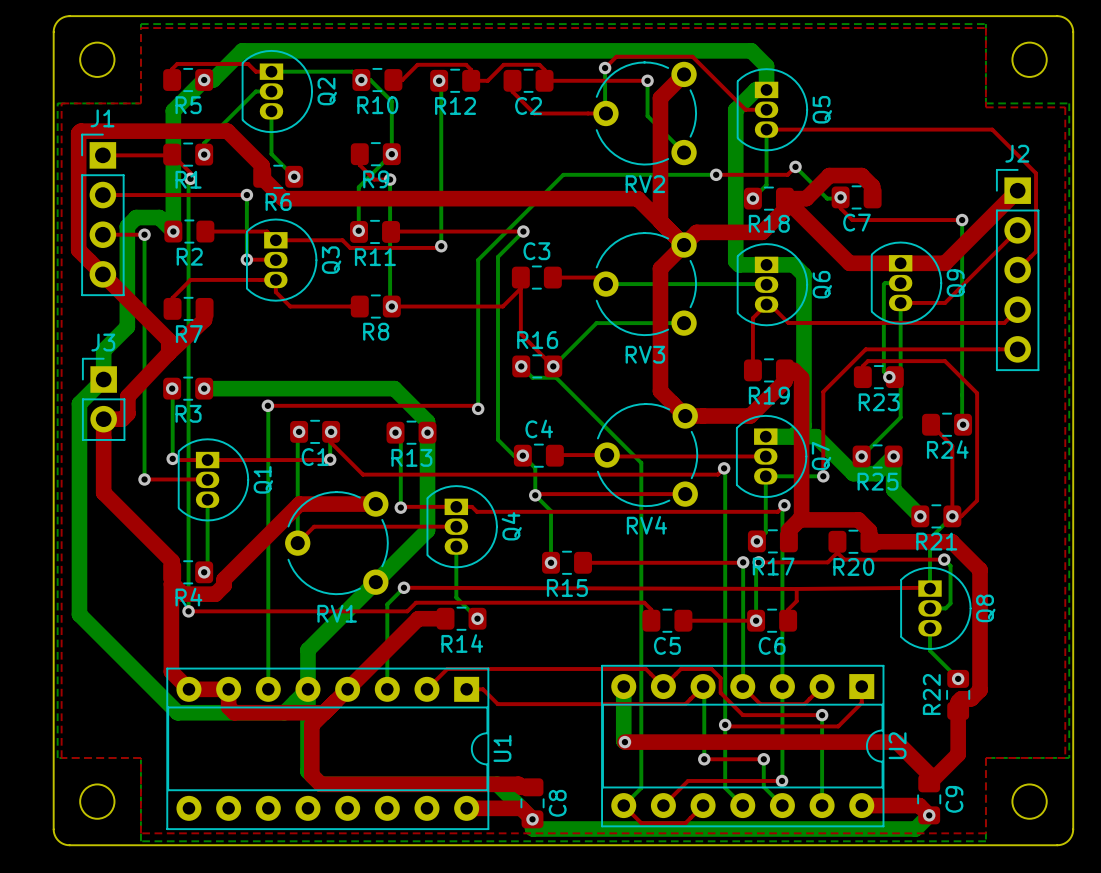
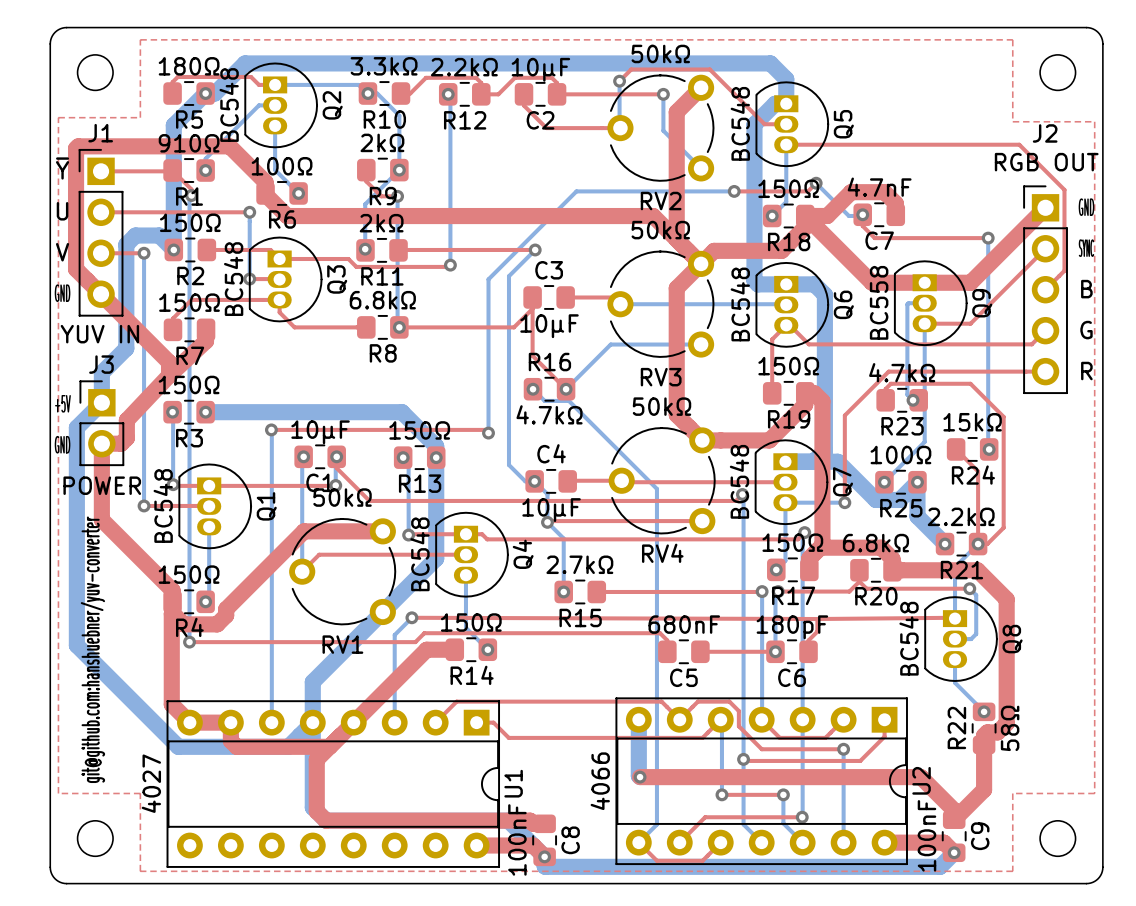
bottom zone outline: (140, 24) (140, 103) (57, 103) (57, 757) (140, 757) (140, 841) (985, 841) (985, 757) (1069, 757) (1069, 103) (985, 103) (985, 24) (140, 24) -> none
RV2 value: none -> 50kΩ (660, 53)
R5 value: none -> 180Ω (189, 66)
R10 value: none -> 3.3kΩ (384, 66)
R12 value: none -> 2.2kΩ (464, 67)
C2 value: none -> 10µF (540, 69)
Q2 value: none -> BC548 (229, 105)
Q5 value: none -> BC548 (740, 123)
R9 value: none -> 2kΩ (382, 142)
R1 value: none -> 910Ω (189, 143)
J2 value: none -> RGB OUT (1046, 162)
R6 value: none -> 100Ω (282, 166)
text: none -> ~{Y} (62, 168)
J2 name position: J2 (1017, 153) -> J2 (1045, 133)
C7 value: none -> 4.7nF (879, 187)
R18 value: none -> 150Ω (788, 188)
text: none -> GND (1086, 207)
text: none -> U (62, 211)
R2 value: none -> 150Ω (190, 222)
R11 value: none -> 2kΩ (381, 223)
RV3 value: none -> 50kΩ (660, 230)
text: none -> SYNC (1086, 248)
text: none -> V (62, 252)
Q3 value: none -> BC548 (233, 279)
text: none -> B (1086, 289)
text: none -> GND (62, 293)
R8 value: none -> 6.8kΩ (382, 300)
R7 value: none -> 150Ω (189, 302)
Q9 value: none -> BC558 (879, 302)
Q6 value: none -> BC548 (740, 304)
C3 value: none -> 10µF (549, 326)
text: none -> G (1086, 330)
J1 value: none -> YUV IN (99, 334)
R19 value: none -> 150Ω (788, 366)
text: none -> R (1086, 371)
R23 value: none -> 4.7kΩ (902, 372)
R3 value: none -> 150Ω (189, 384)
text: none -> +5V (62, 403)
RV4 value: none -> 50kΩ (661, 406)
R16 value: none -> 4.7kΩ (549, 414)
R24 value: none -> 15kΩ (972, 422)
R13 value: none -> 150Ω (419, 430)
C1 value: none -> 10µF (320, 432)
text: none -> GND (62, 444)
R25 value: none -> 100Ω (900, 455)
Q7 value: none -> BC548 (739, 481)
J3 value: none -> POWER (102, 485)
RV1 value: none -> 50kΩ (342, 497)
Q1 value: none -> BC548 (163, 505)
C4 value: none -> 10µF (551, 510)
R21 value: none -> 2.2kΩ (961, 516)
R17 value: none -> 150Ω (792, 542)
R20 value: none -> 6.8kΩ (875, 543)
Q4 value: none -> BC548 (420, 554)
R15 value: none -> 2.7kΩ (579, 564)
R4 value: none -> 150Ω (189, 574)
R14 value: none -> 150Ω (471, 622)
C5 value: none -> 680nF (684, 624)
C6 value: none -> 180pF (792, 627)
Q8 value: none -> BC548 (909, 638)
text: none -> git@github.com:hanshuebner/yuv-converter (92, 649)
R22 value: none -> 58Ω (1010, 728)
U2 value: none -> 4066 (600, 781)
U1 value: none -> 4027 (151, 783)
C9 value: none -> 100nF (926, 835)
C8 value: none -> 100nF (517, 839)

